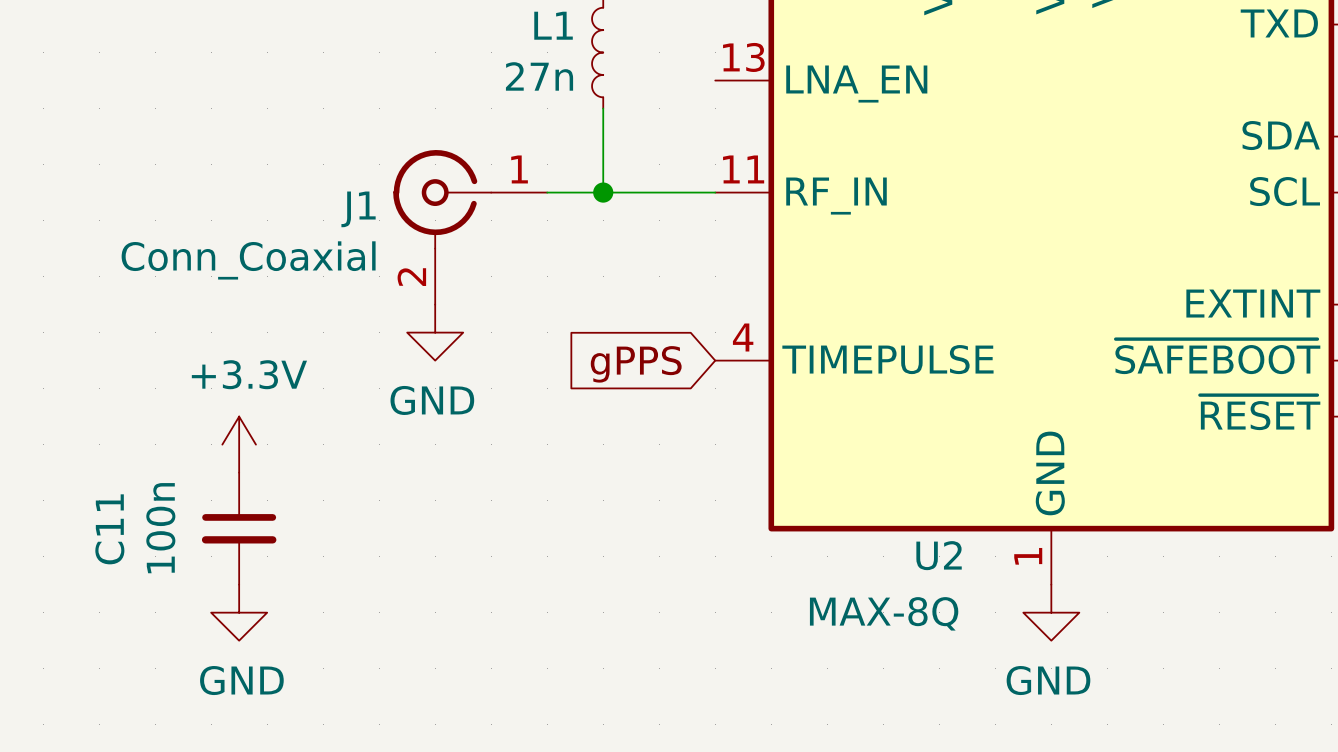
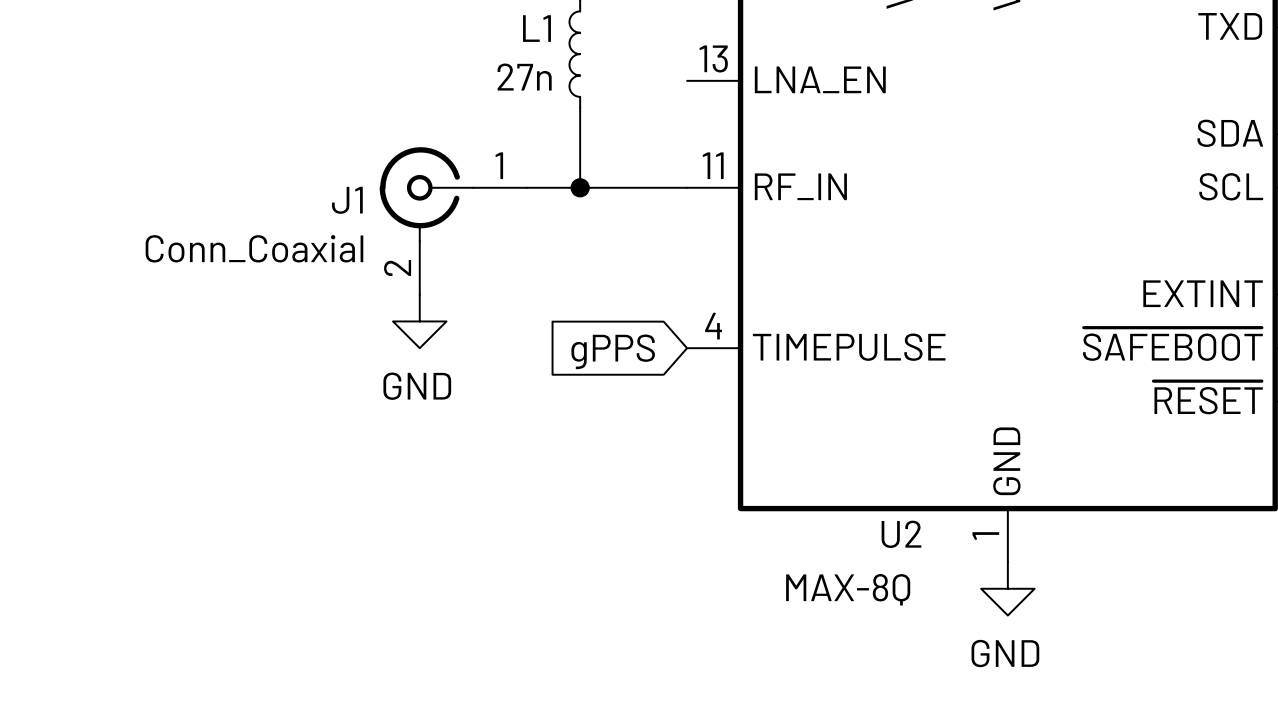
power symbol: +3.3V (239, 444) -> none
C11: 100n (239, 528) -> none
power symbol: GND (239, 612) -> none

